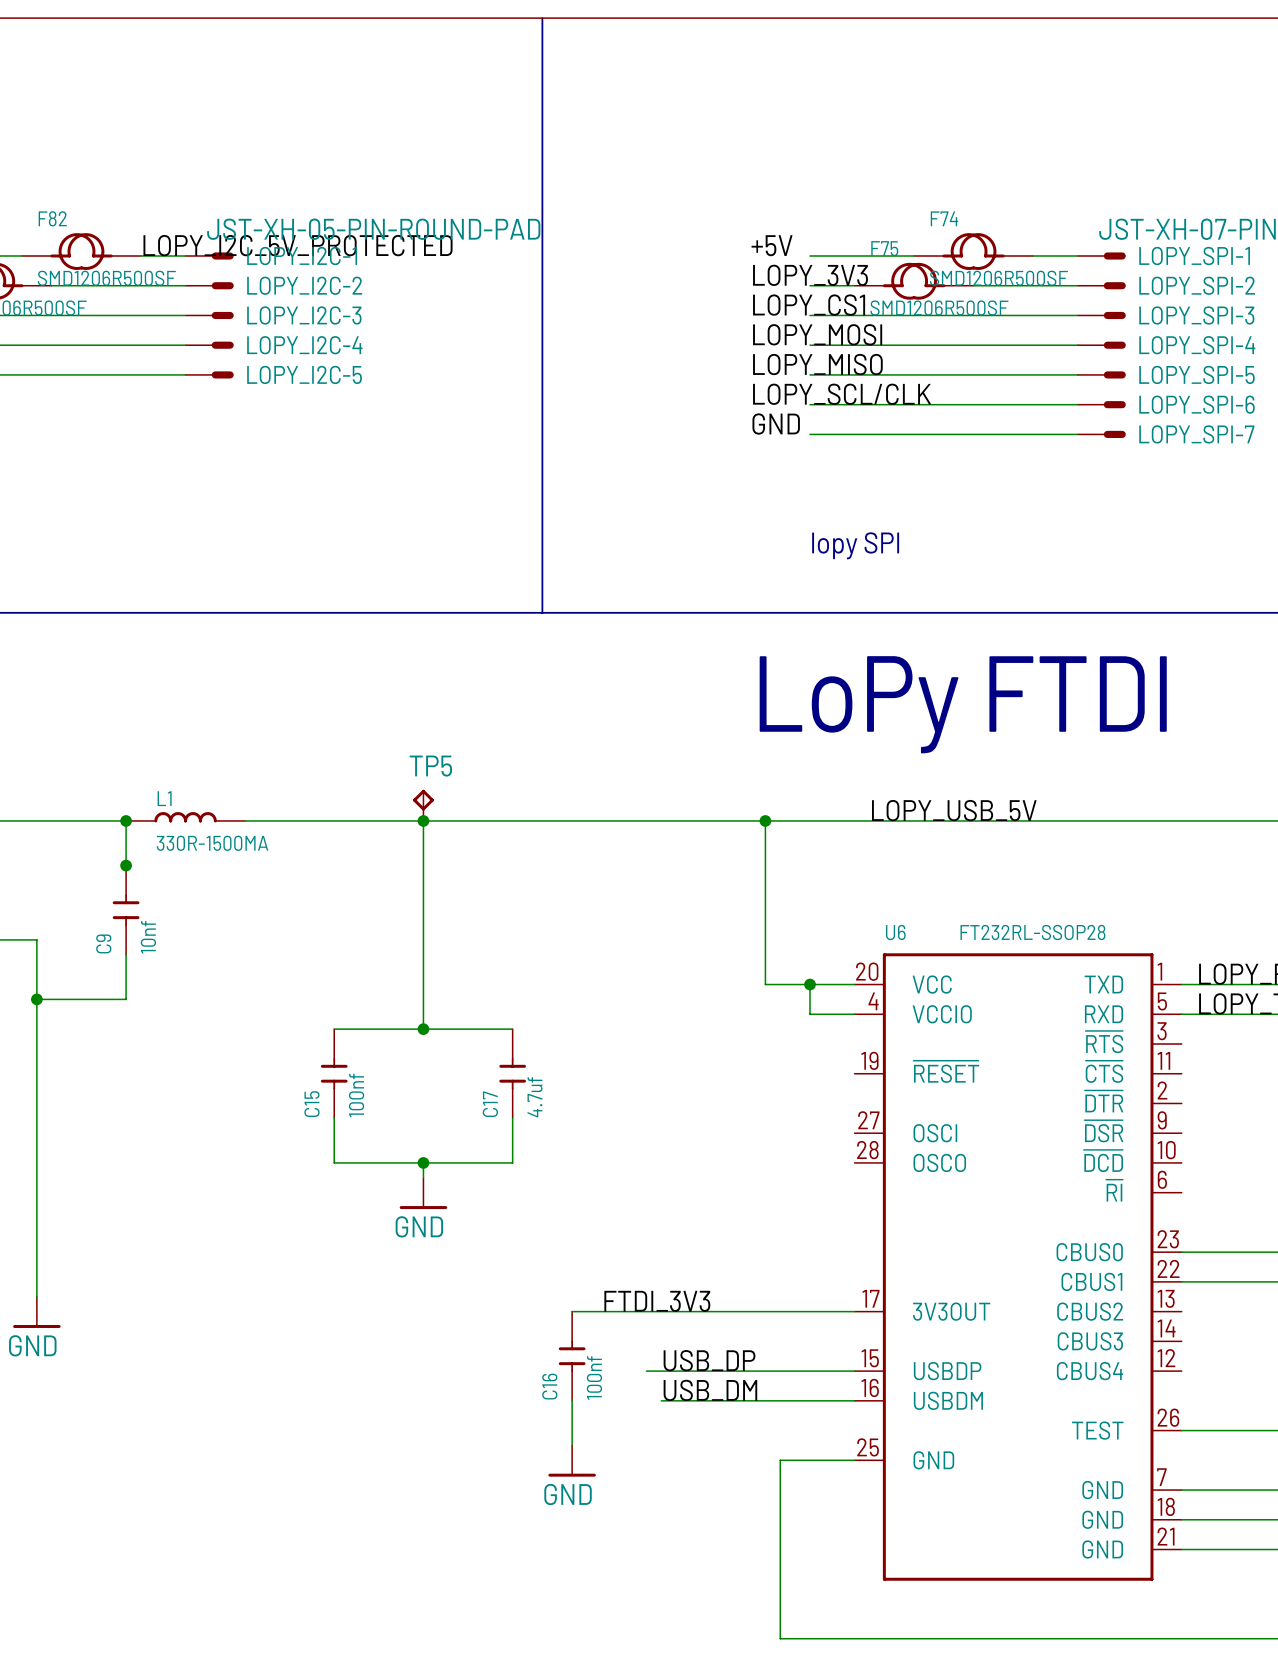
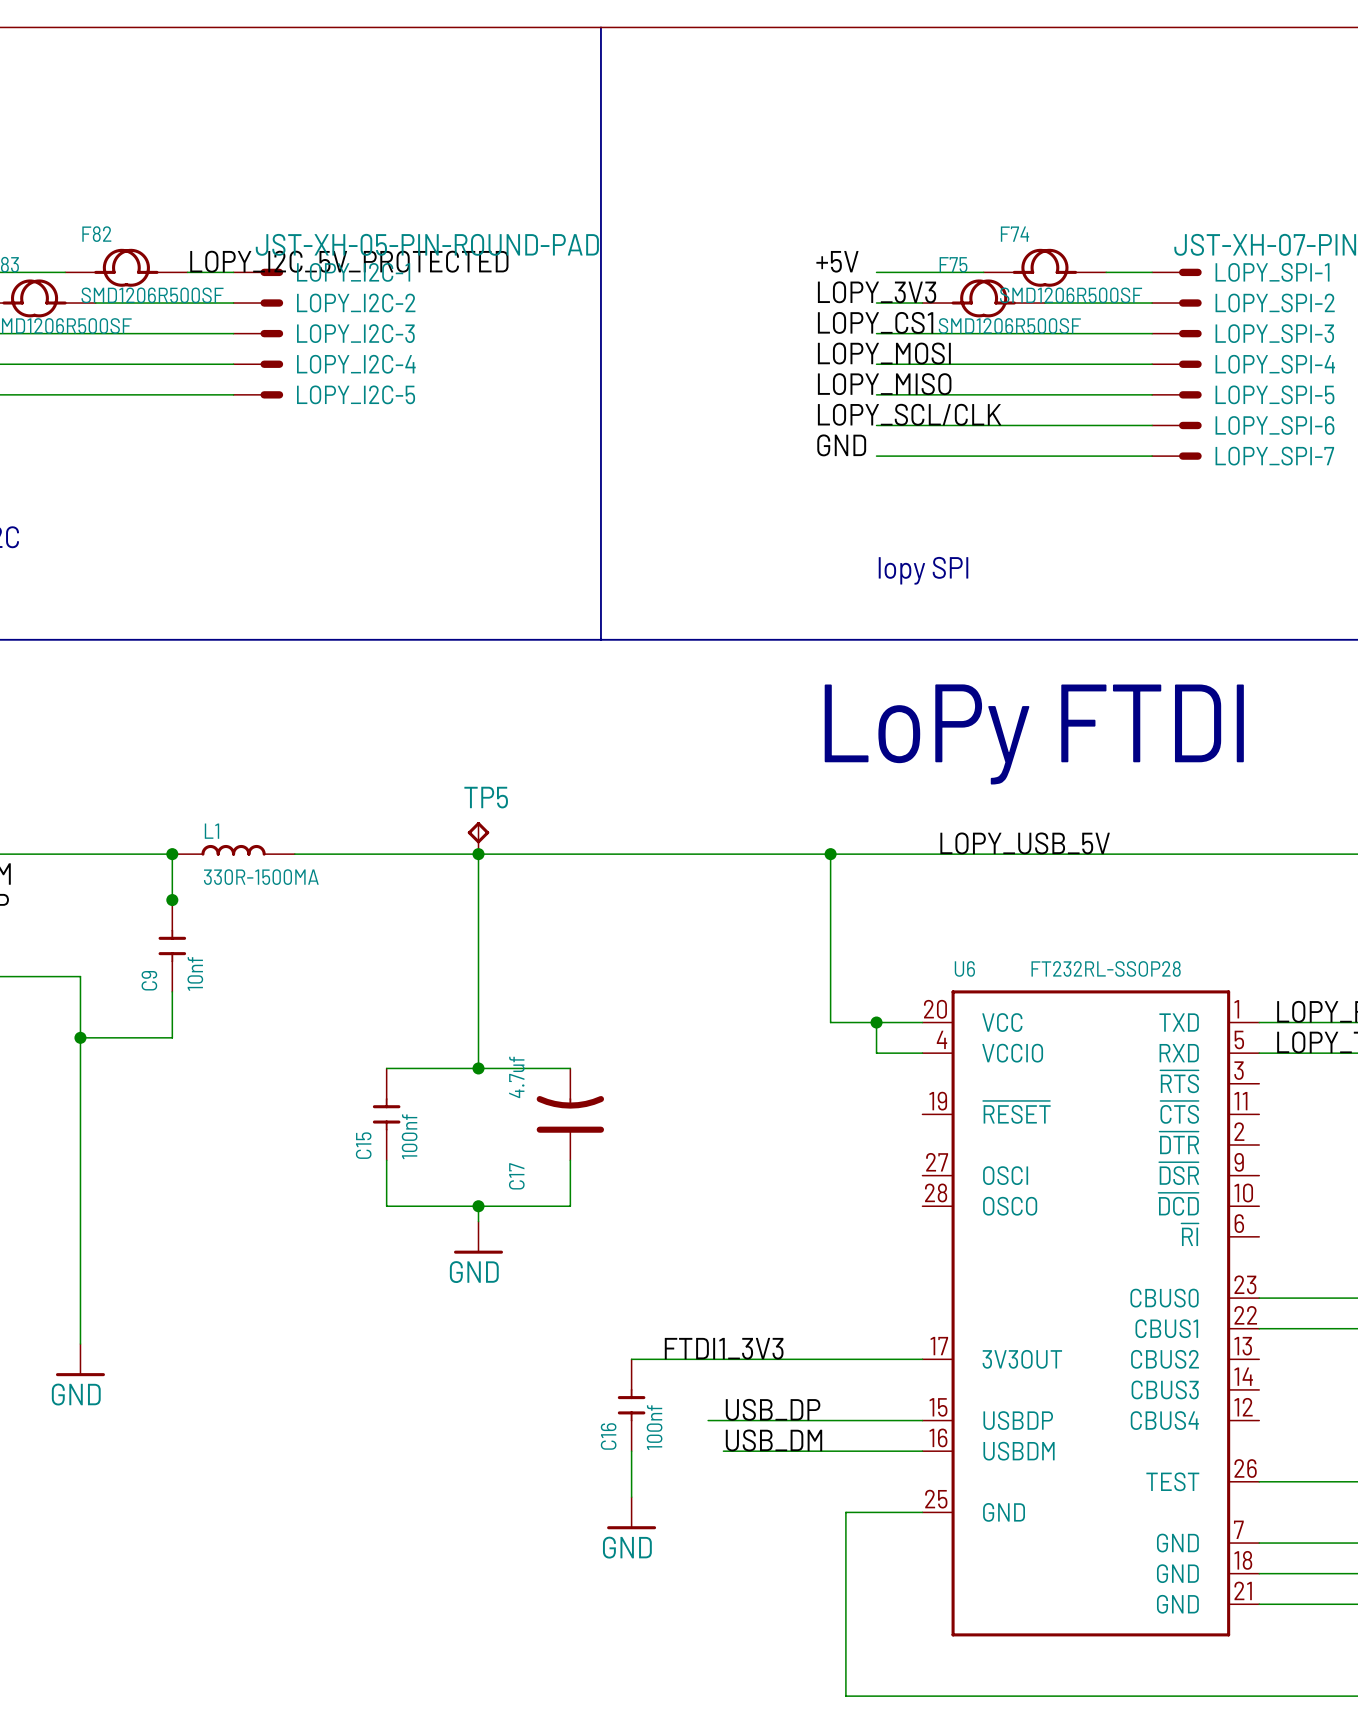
C17 symbol: [499, 1029, 527, 1119] -> [536, 1068, 605, 1161]
C17 value position: 4.7uf (535, 1097) -> 4.7uf (516, 1077)
C17 name position: C17 (490, 1104) -> C17 (516, 1176)
label: FTDI_3V3 (657, 1301) -> FTDI1_3V3 (724, 1348)

